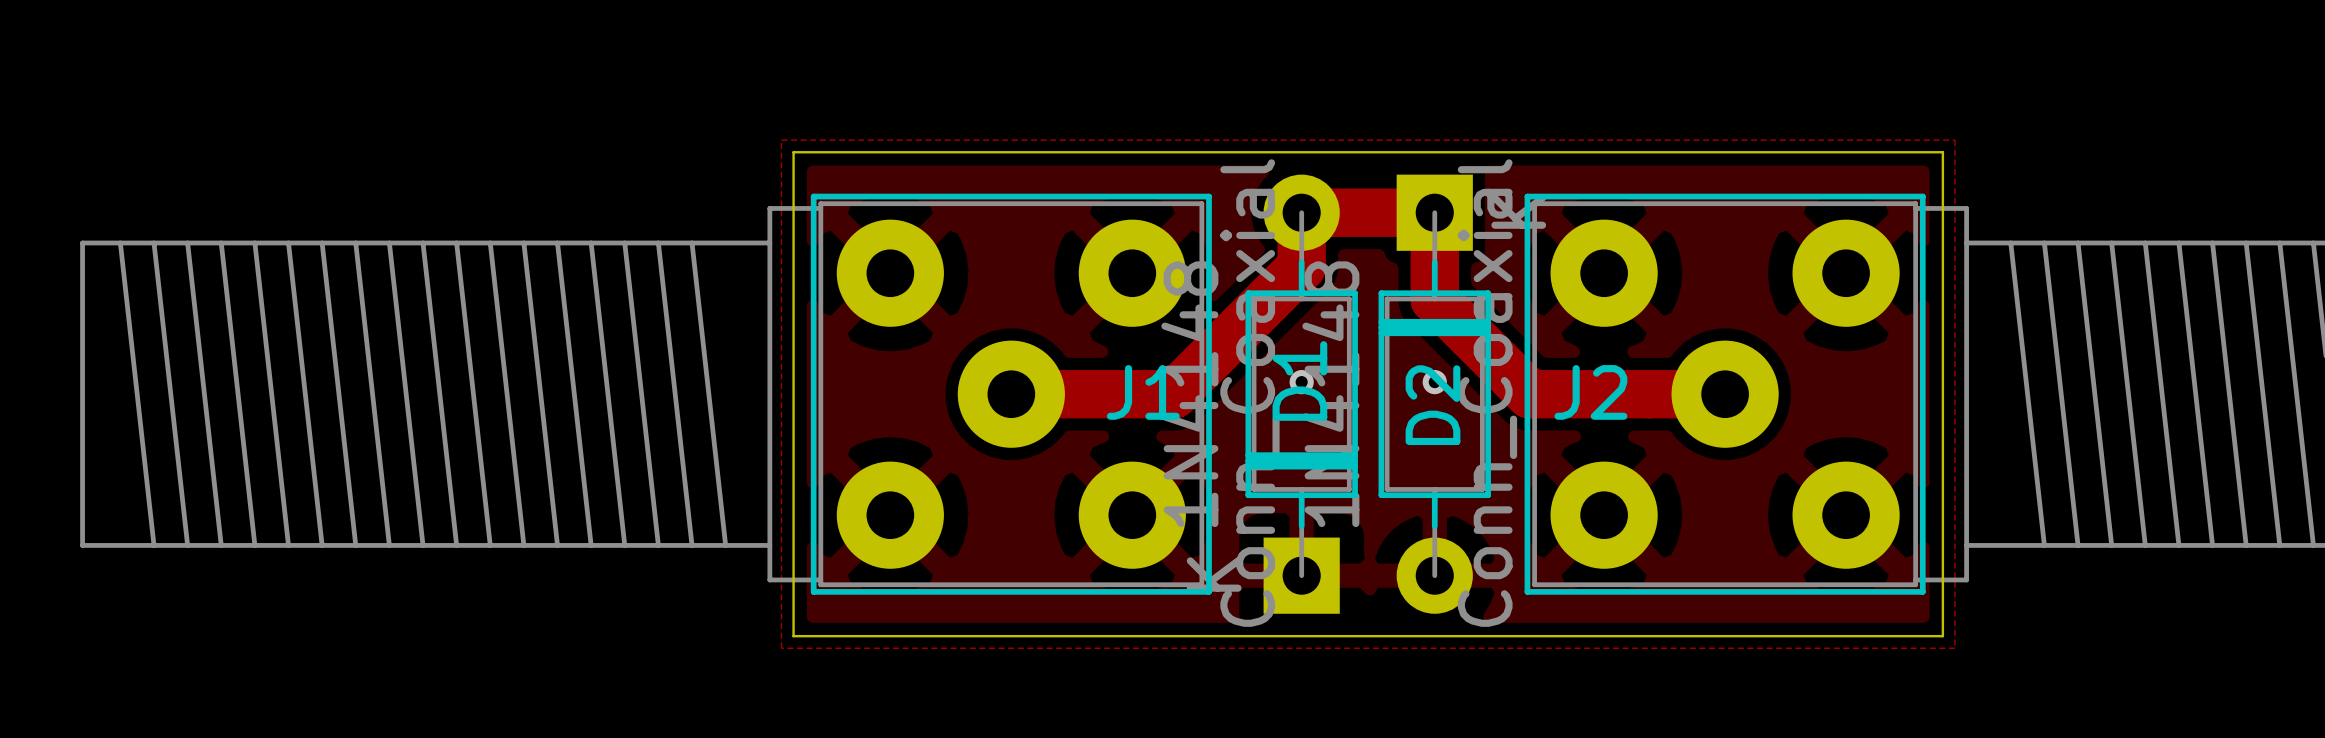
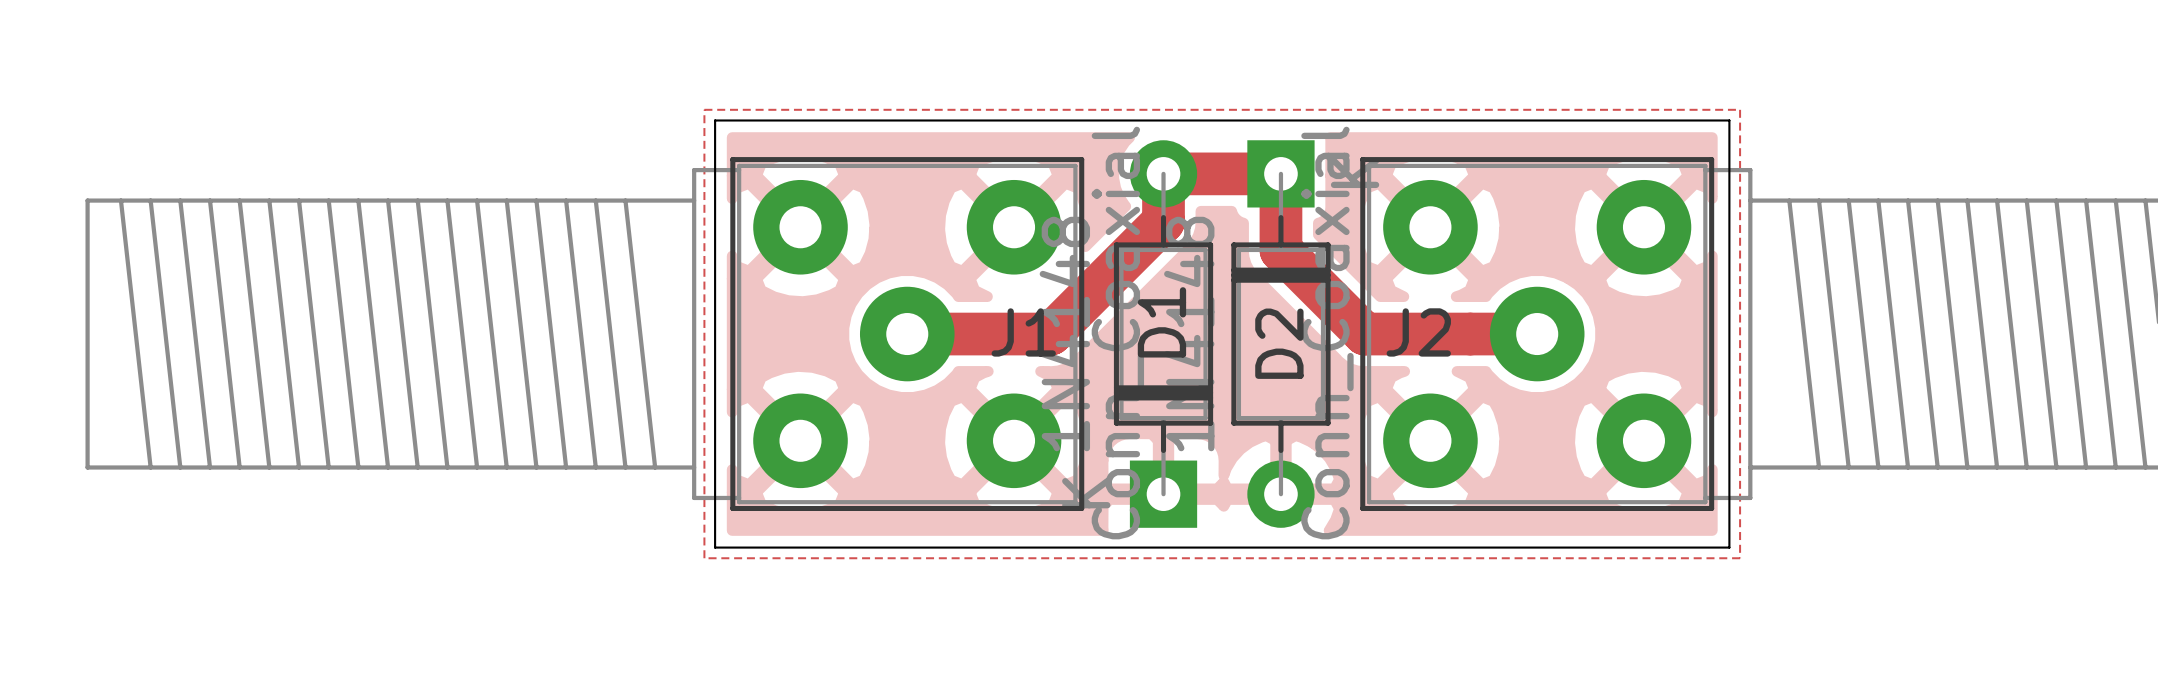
via: (1301, 382) -> none
via: (1434, 382) -> none

